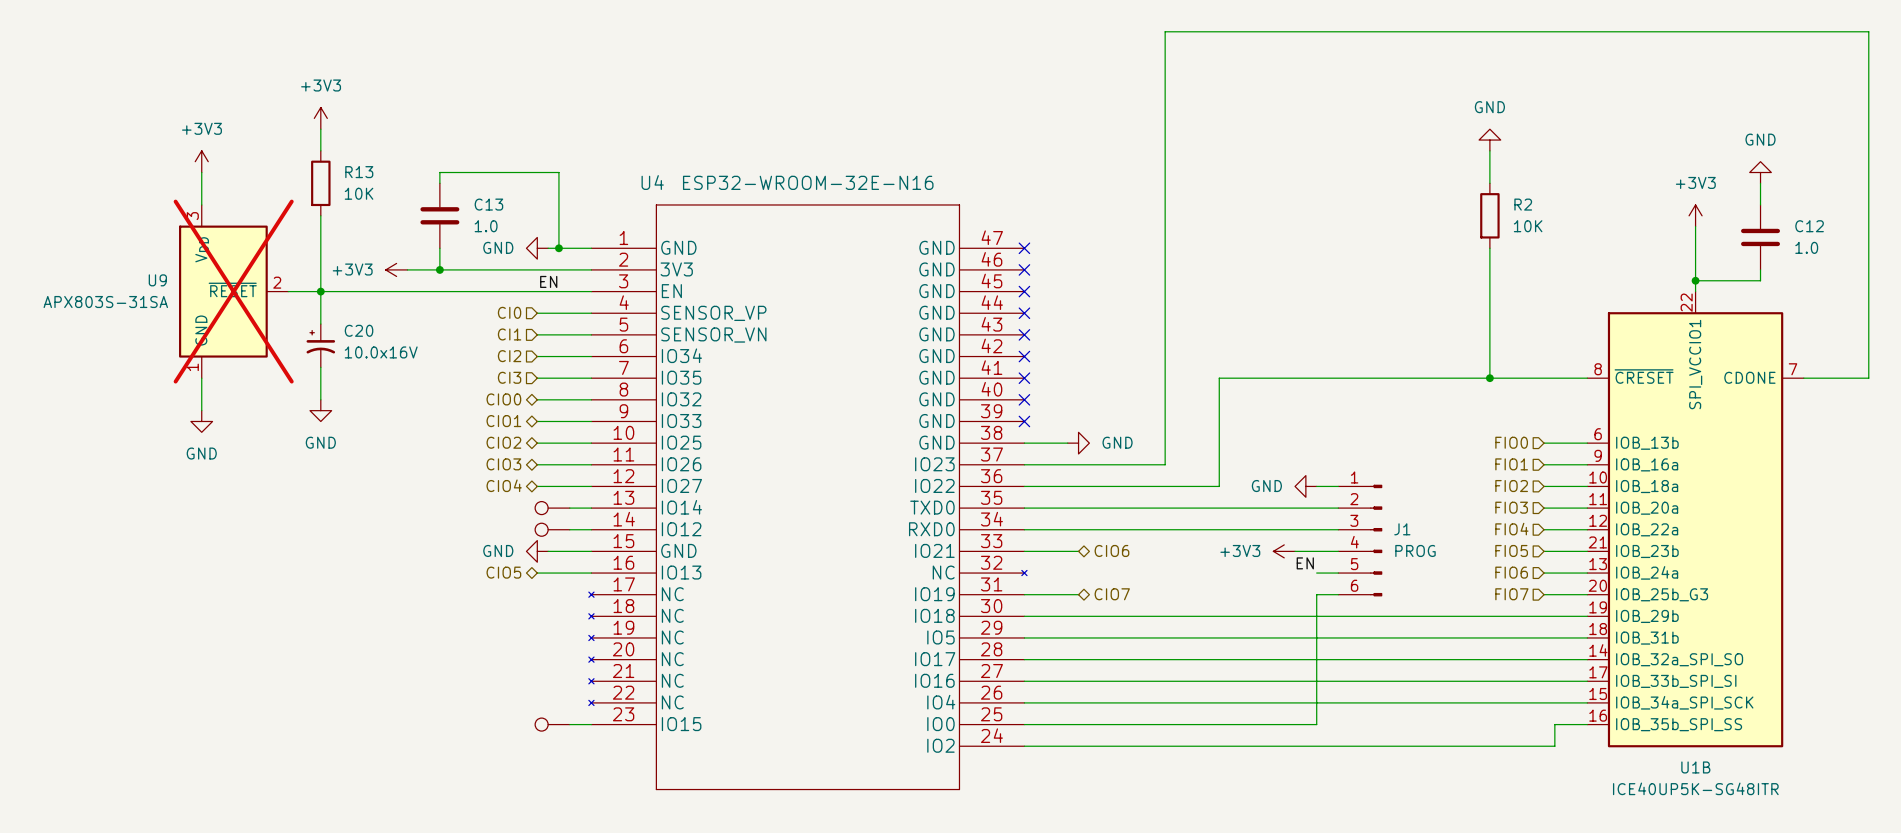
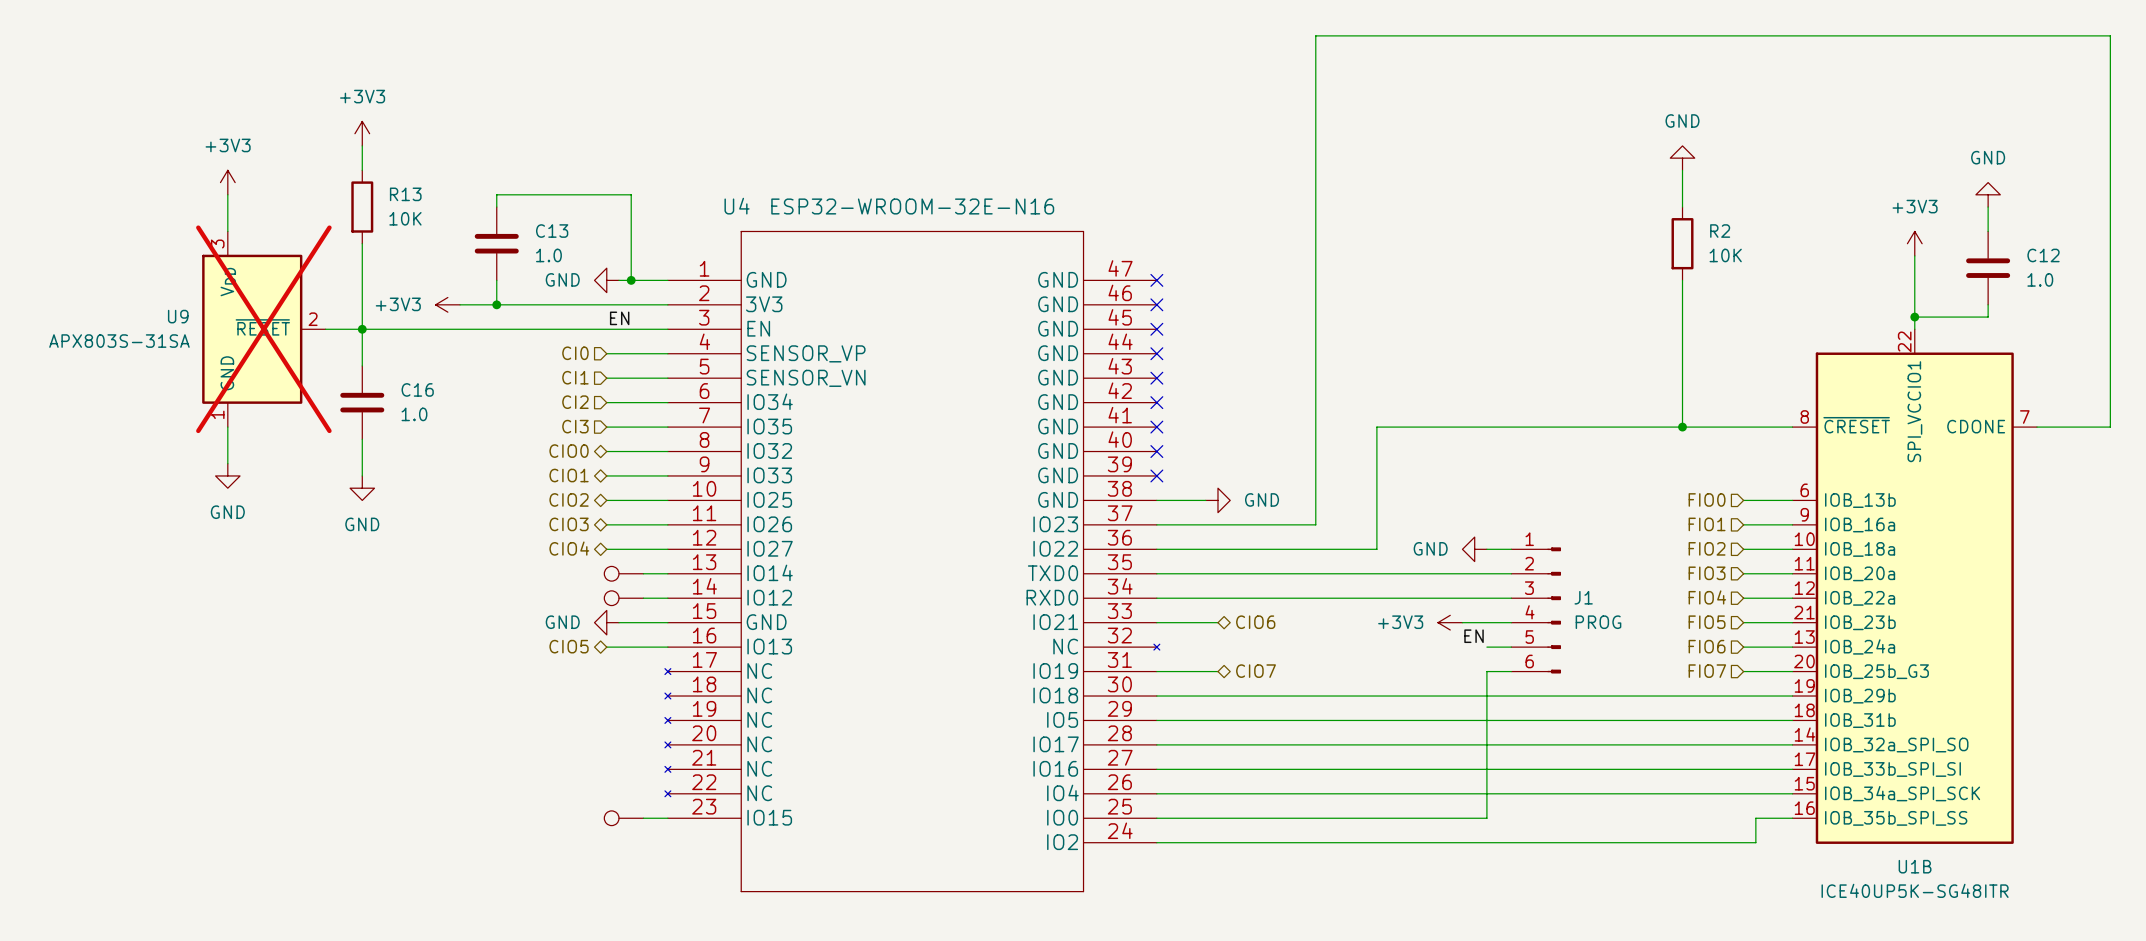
C20: 10.0x16V (320, 345) -> none
C16: none -> 1.0 (362, 402)
power symbol position: GND (320, 410) -> GND (362, 488)

